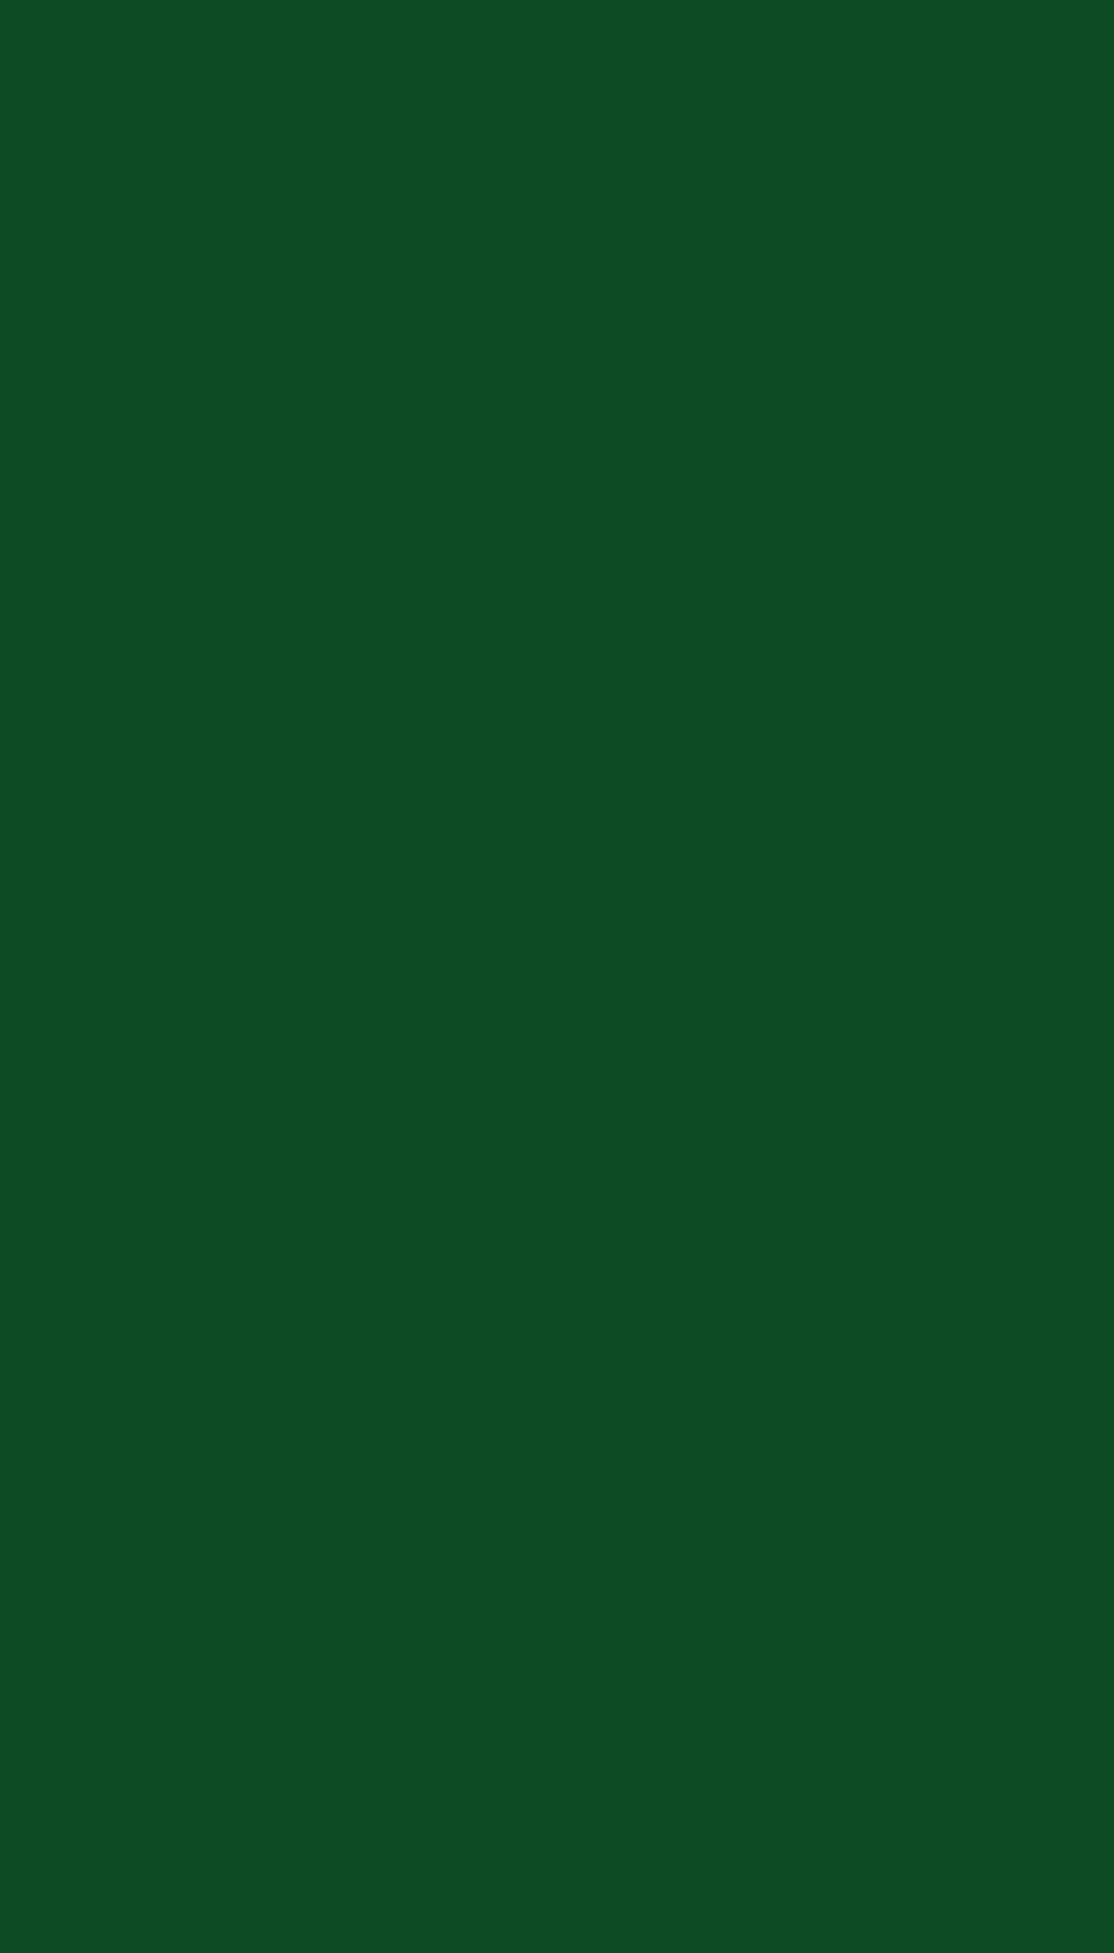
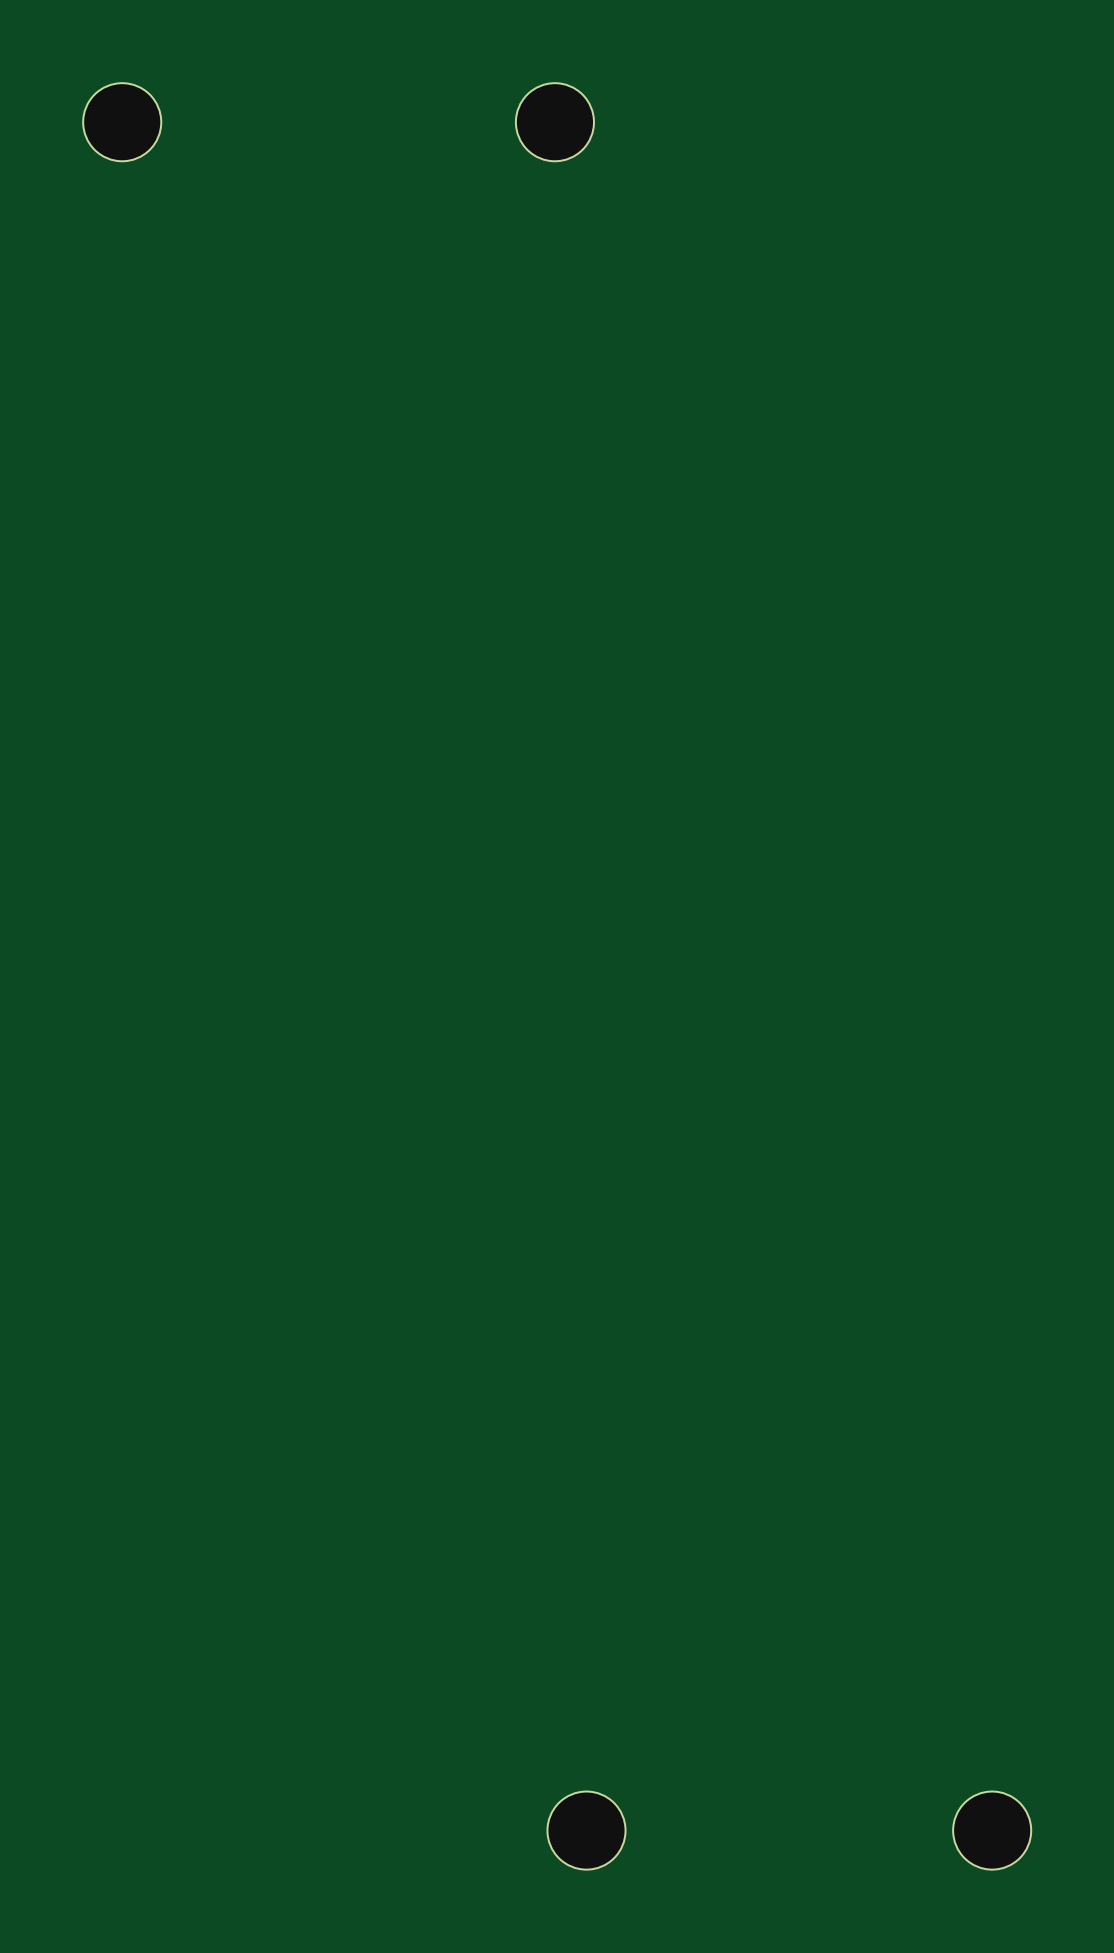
hole: none -> (122, 122)
hole: none -> (554, 122)
hole: none -> (586, 1830)
hole: none -> (992, 1830)

